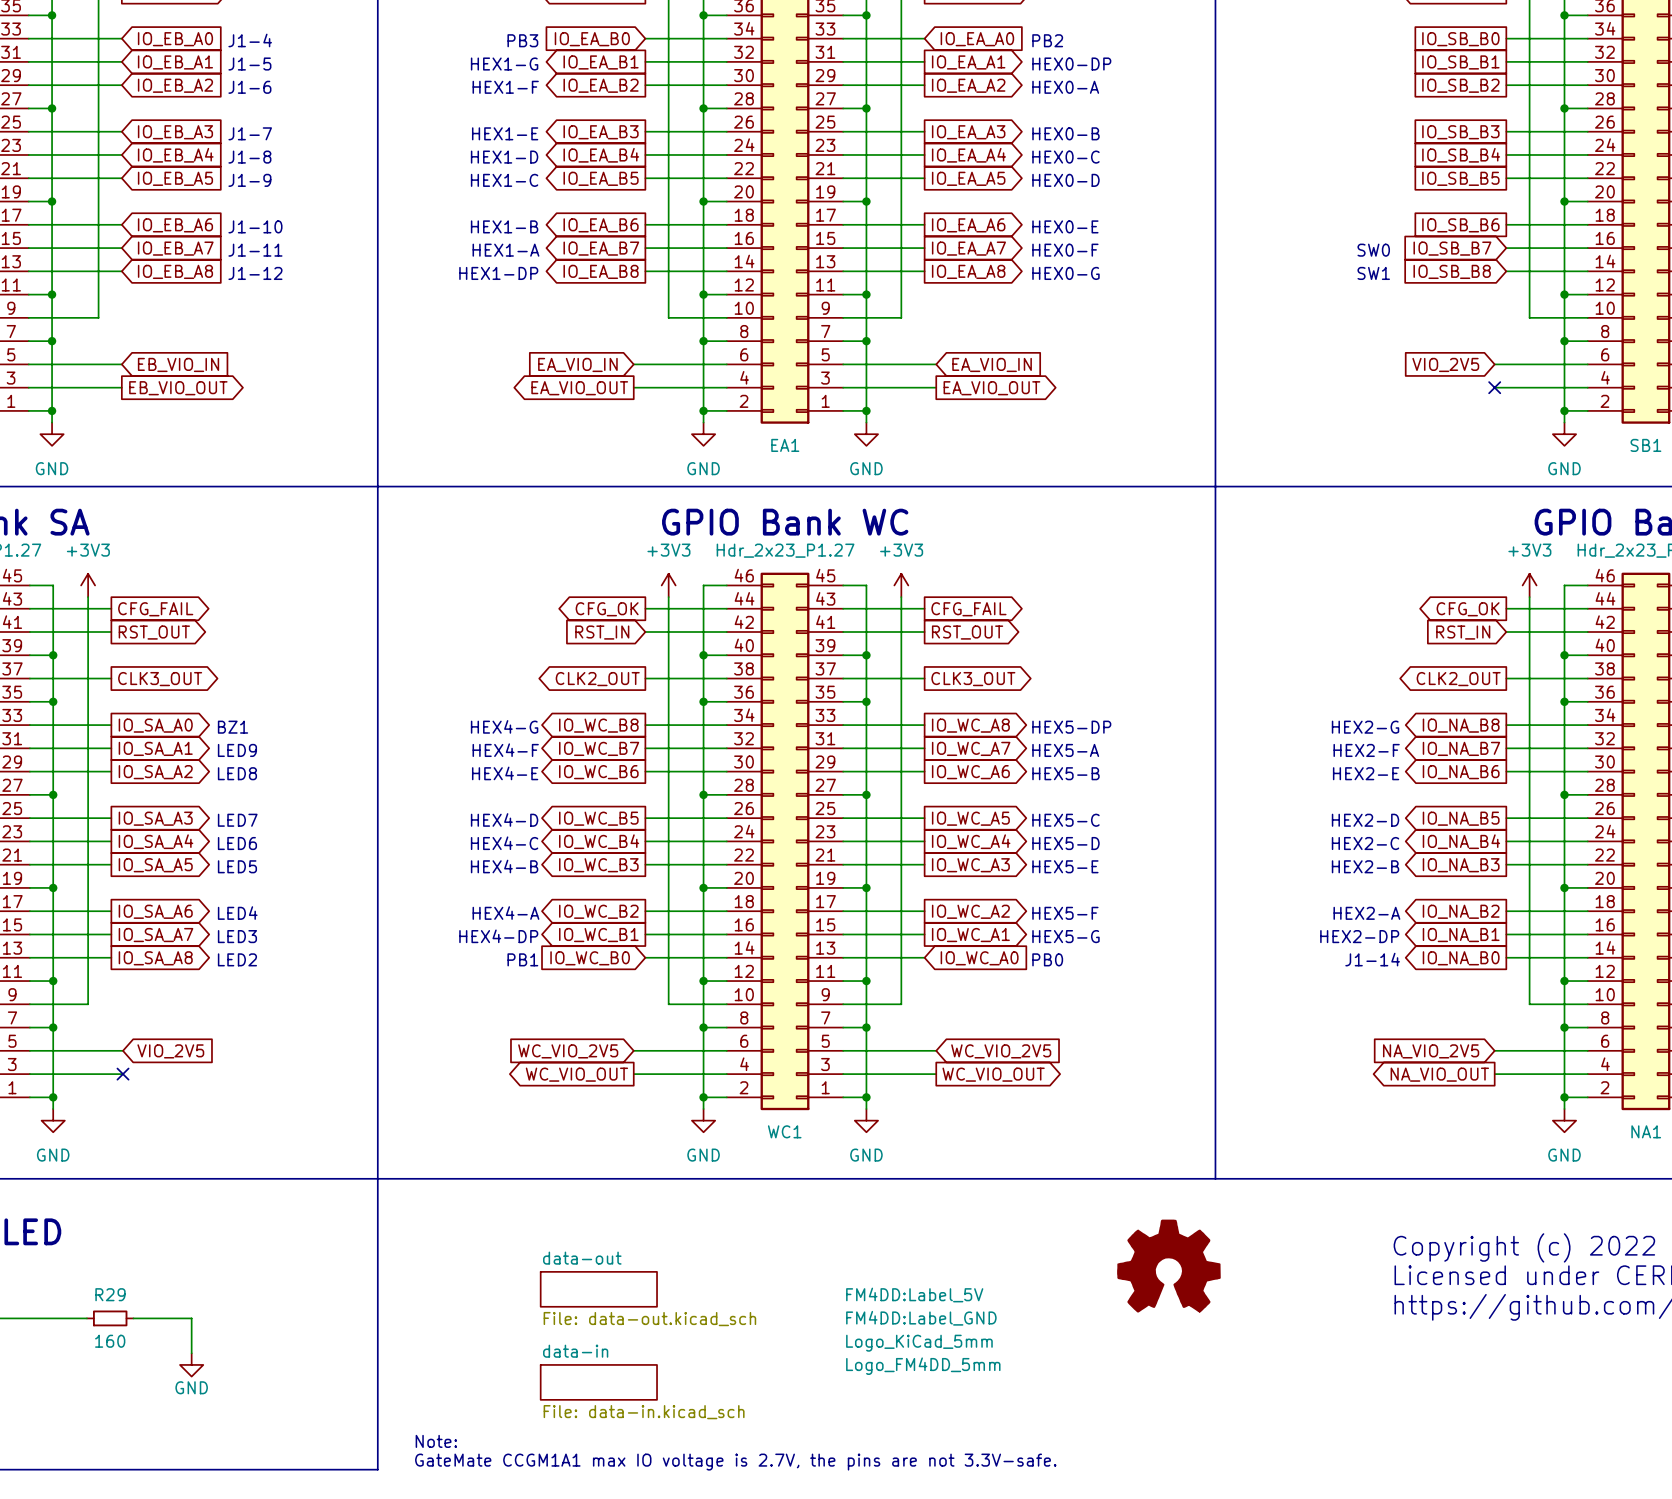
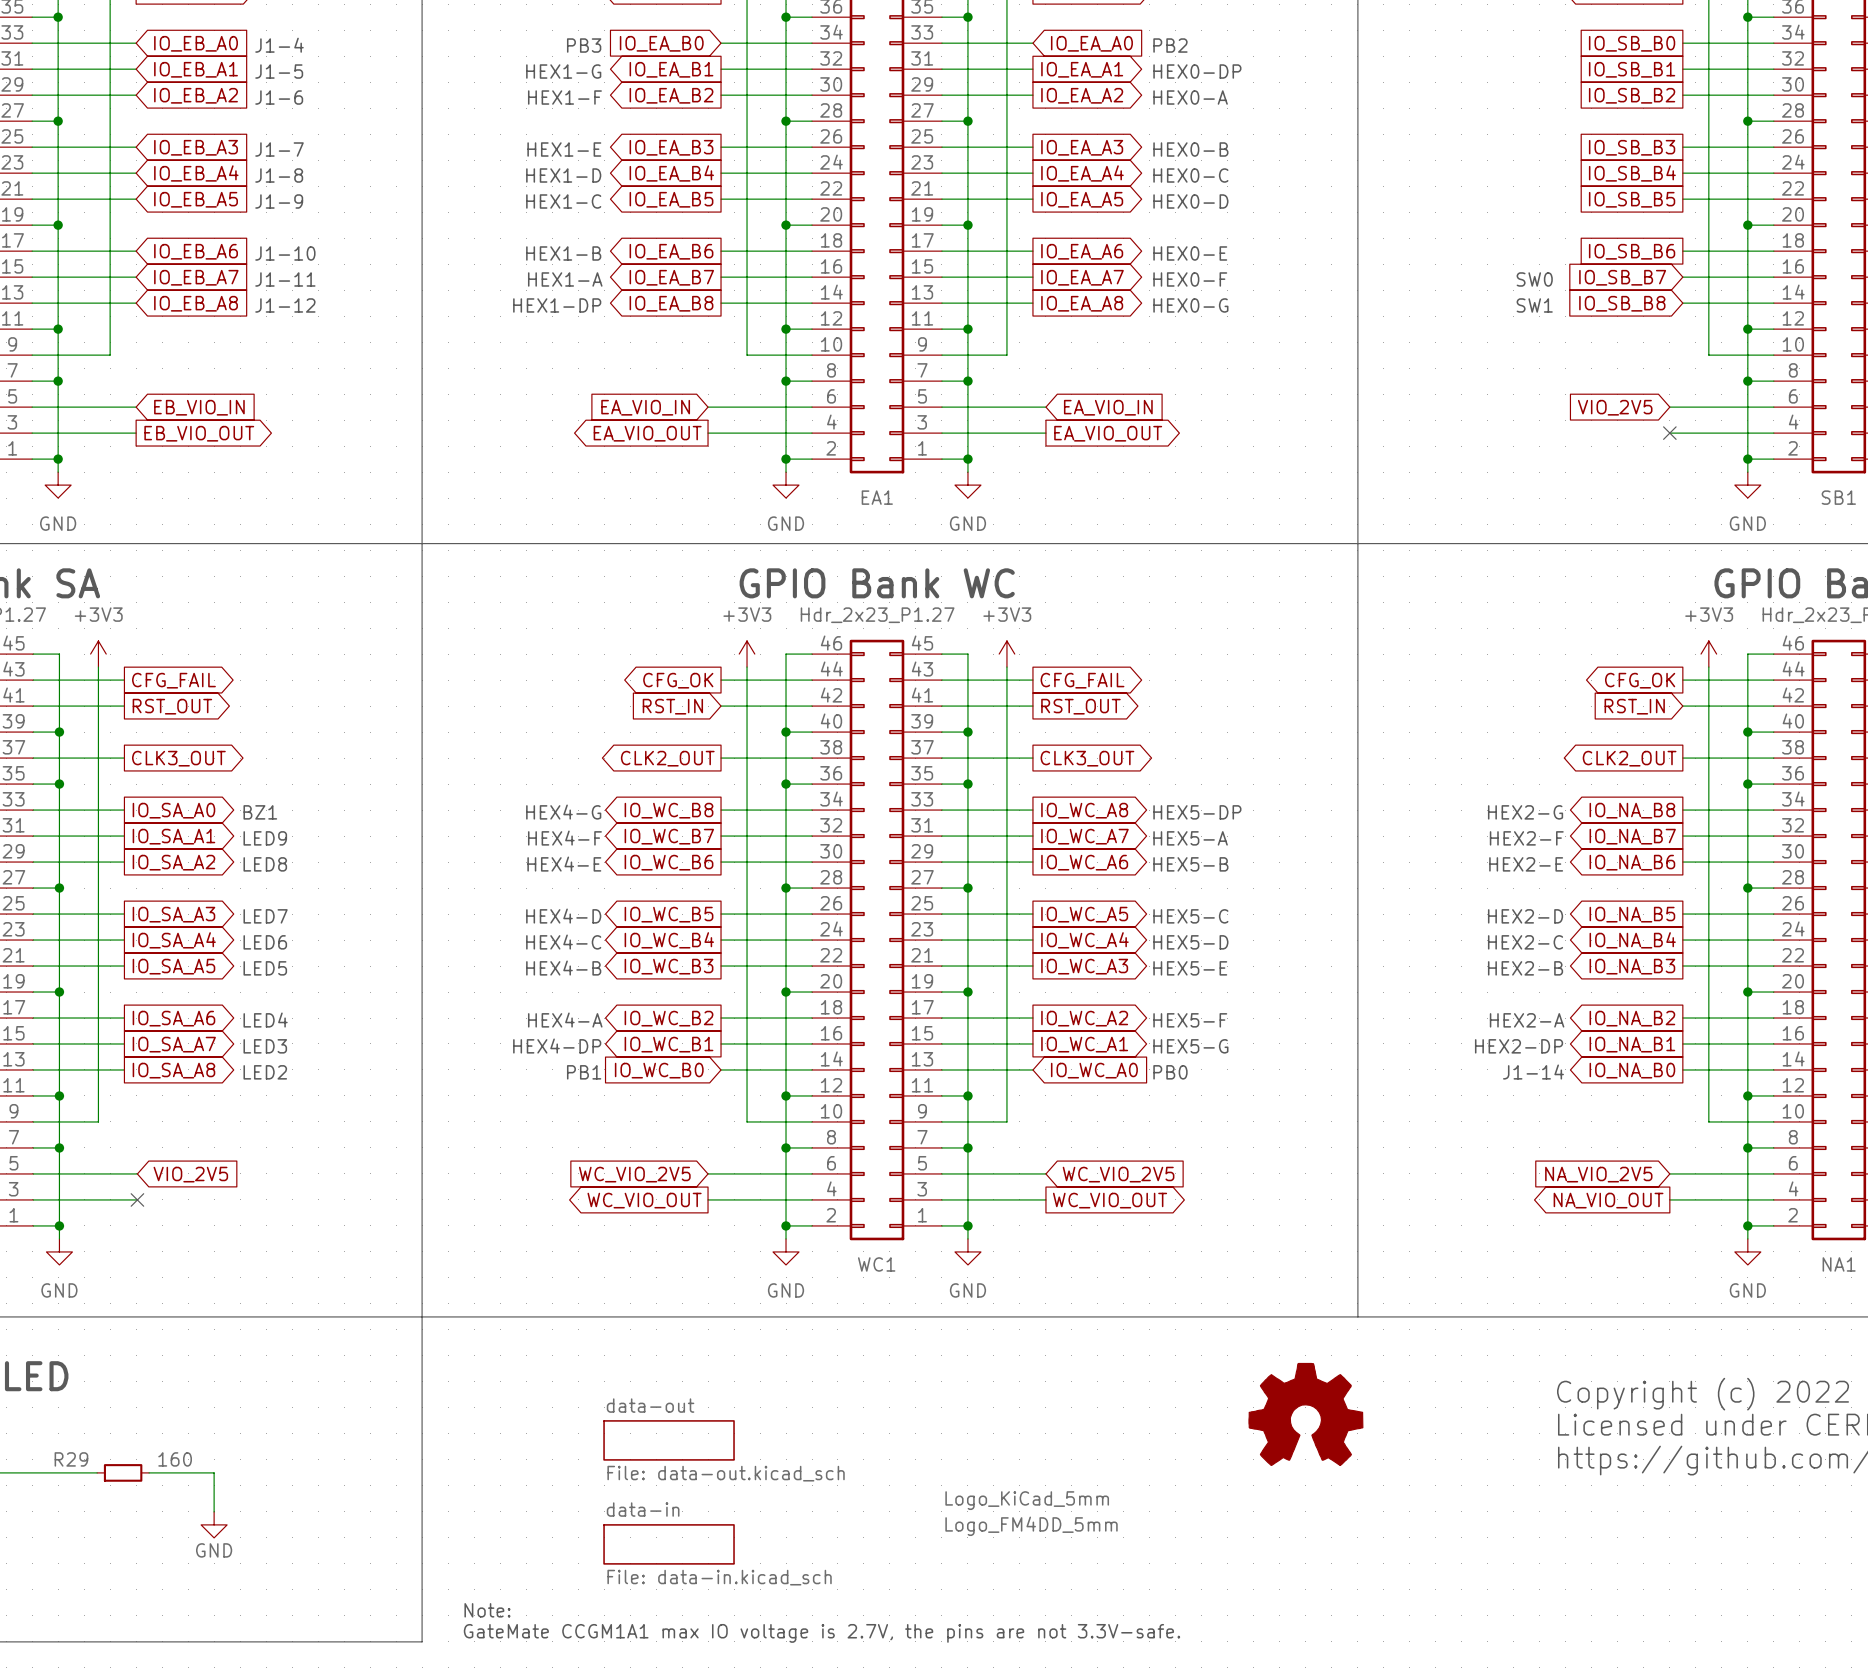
R29 name position: R29 (110, 1294) -> R29 (71, 1459)
part: (914, 1294) -> none
part: (921, 1318) -> none
R29 value position: 160 (110, 1341) -> 160 (175, 1459)

